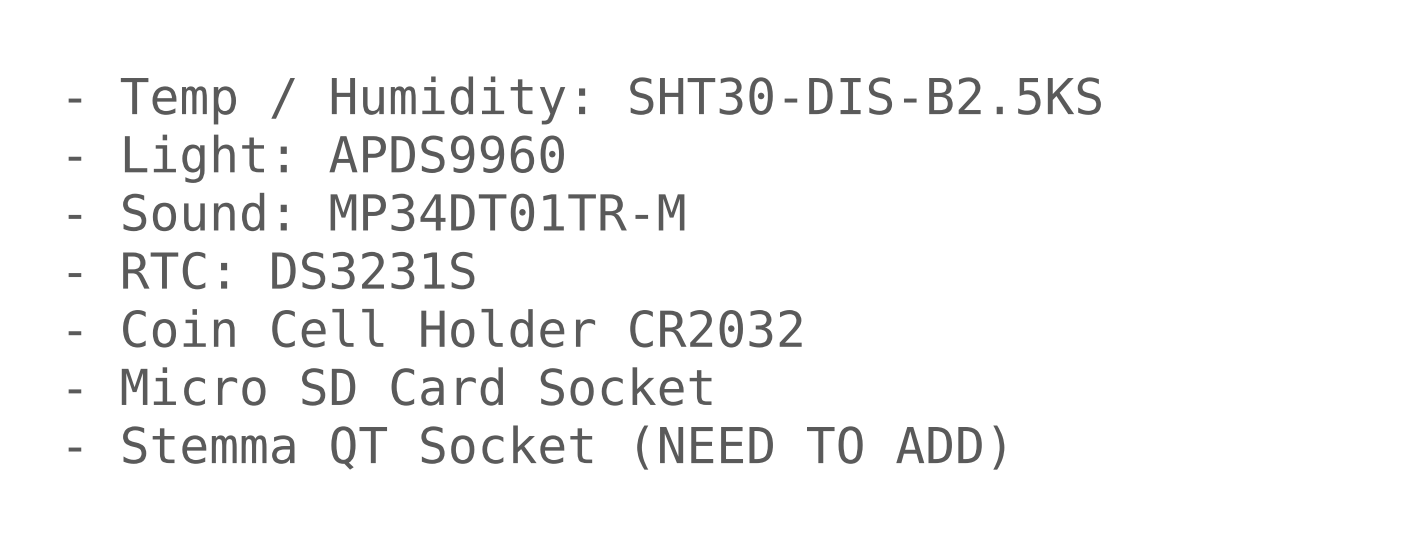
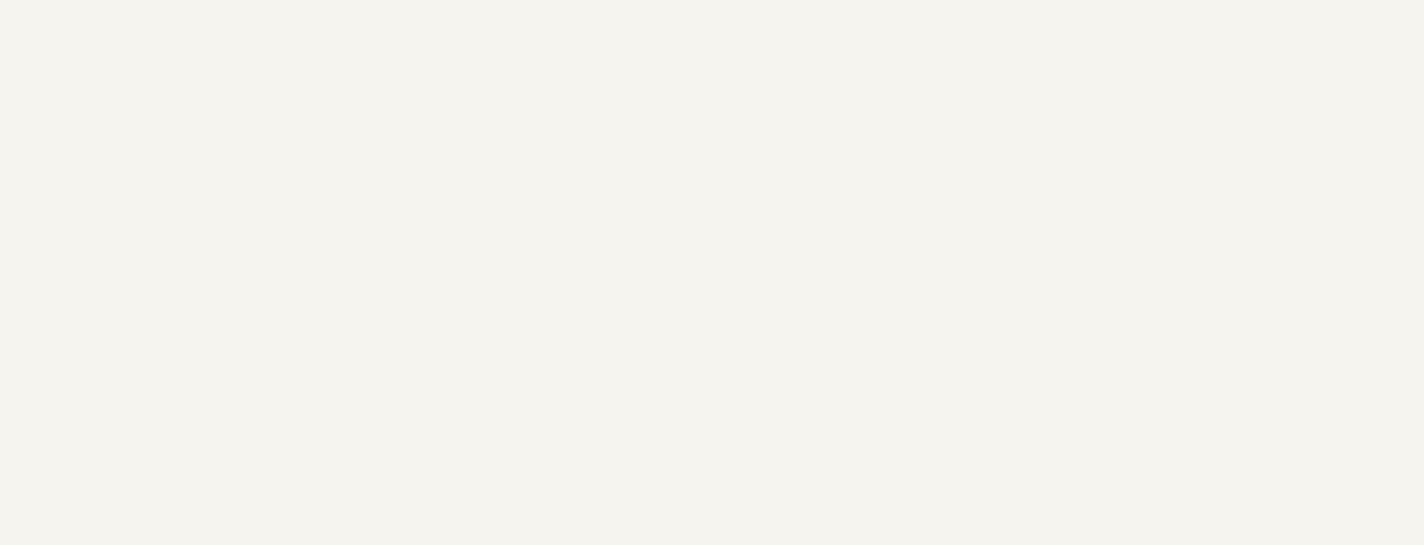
text: - Temp / Humidity: SHT30-DIS-B2.5KS (584, 100) -> none
text: - Light: APDS9960 (316, 158) -> none
text: - Sound: MP34DT01TR-M (376, 211) -> none
text: - RTC: DS3231S (271, 270) -> none
text: - Coin Cell Holder CR2032 (435, 328) -> none
text: - Micro SD Card Socket (390, 386) -> none
text: - Stemma QT Socket (NEED TO ADD) (536, 447) -> none

